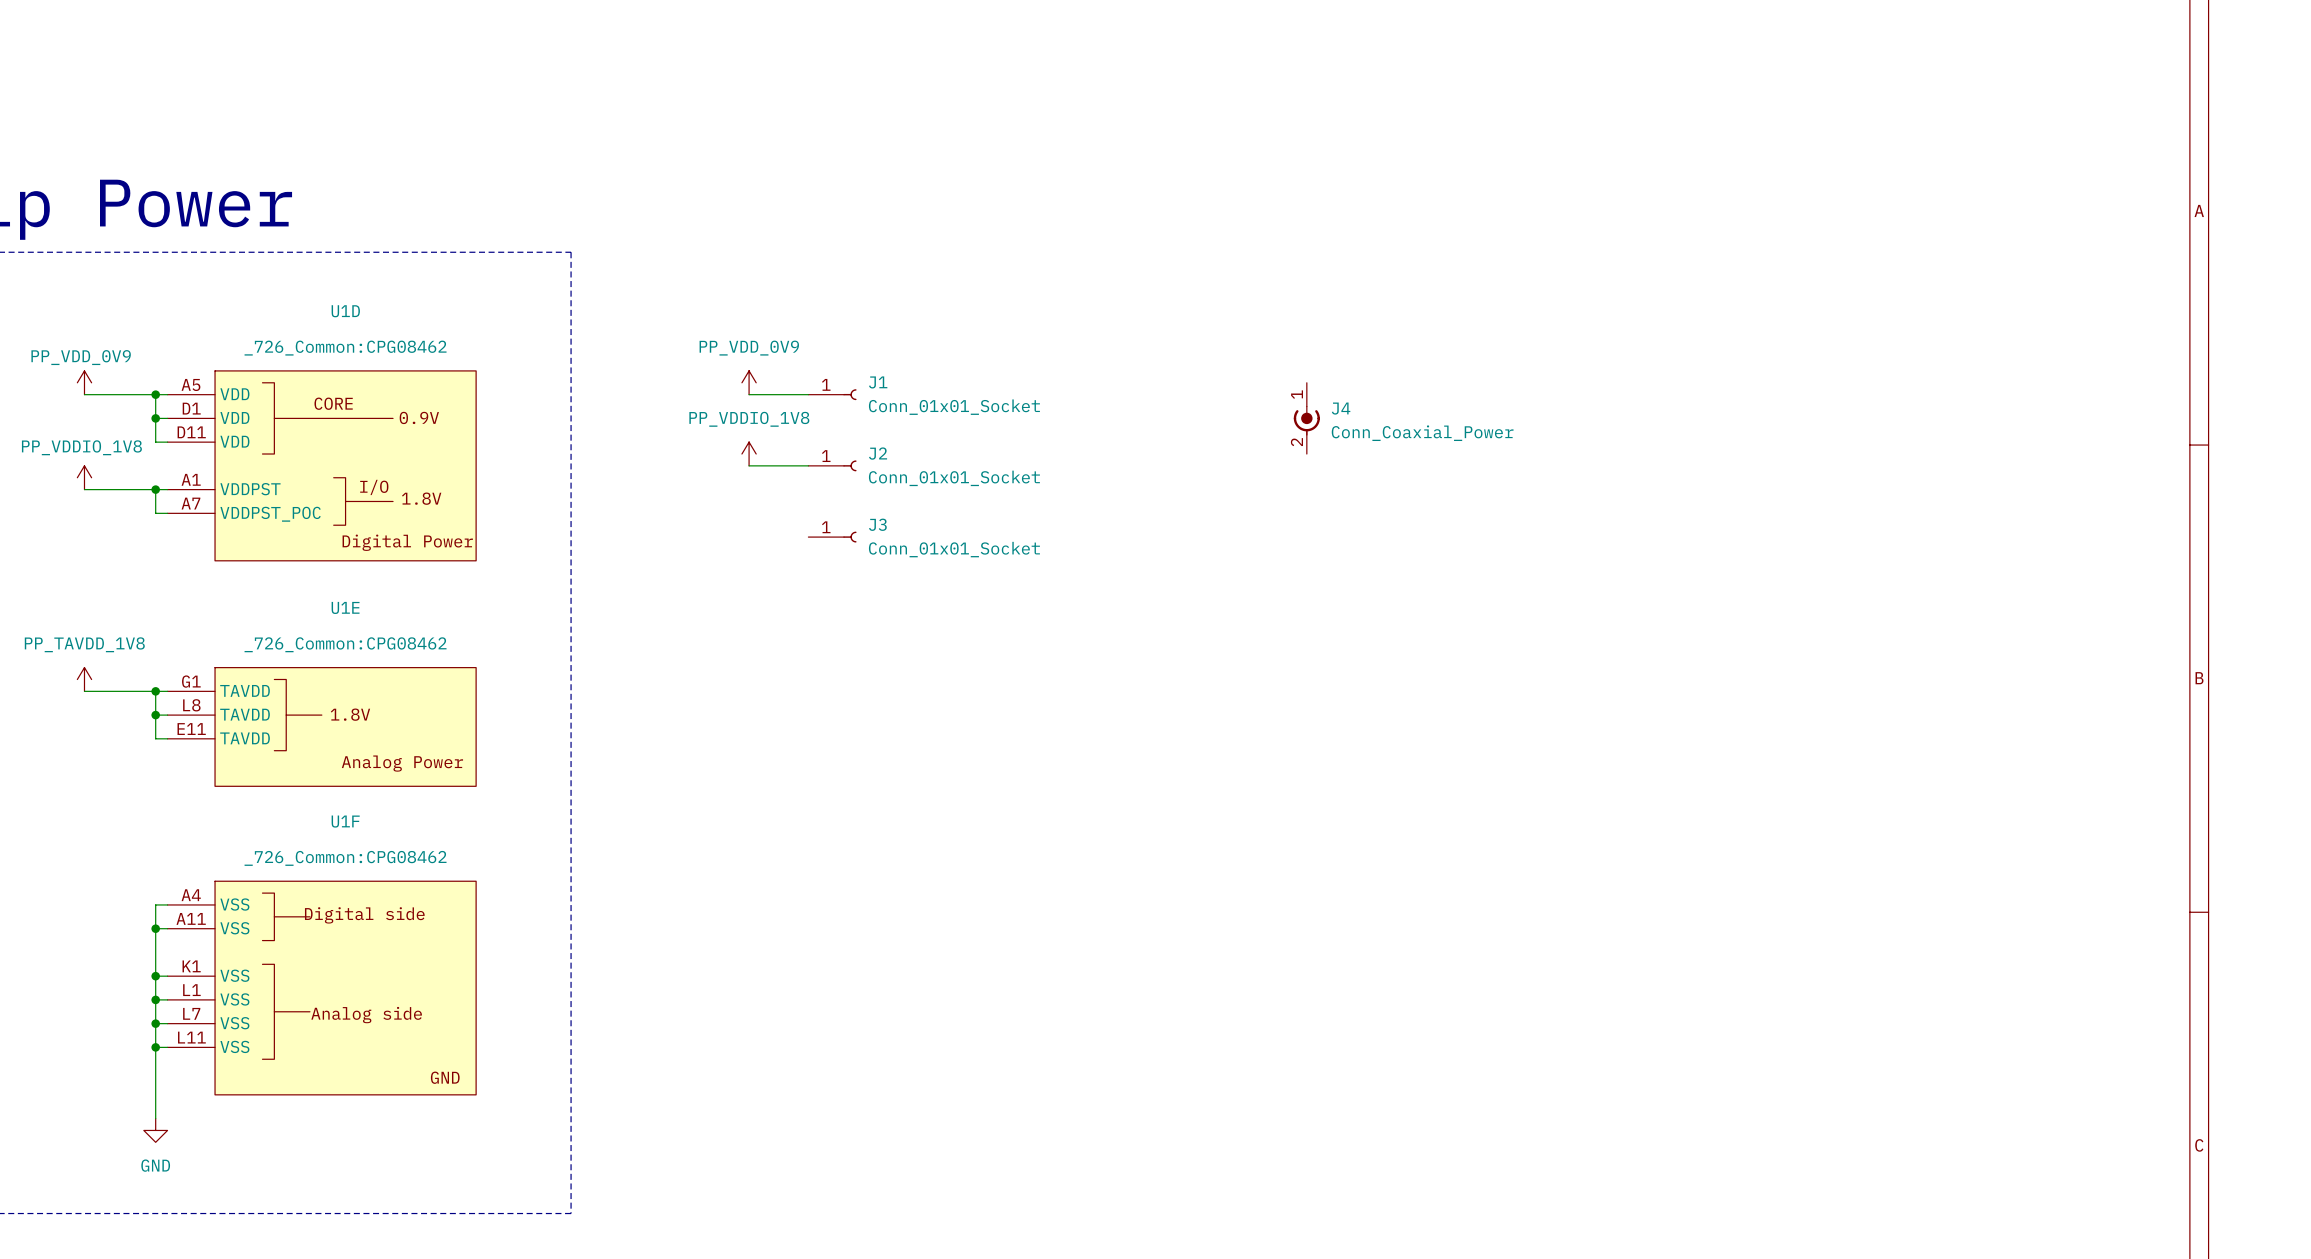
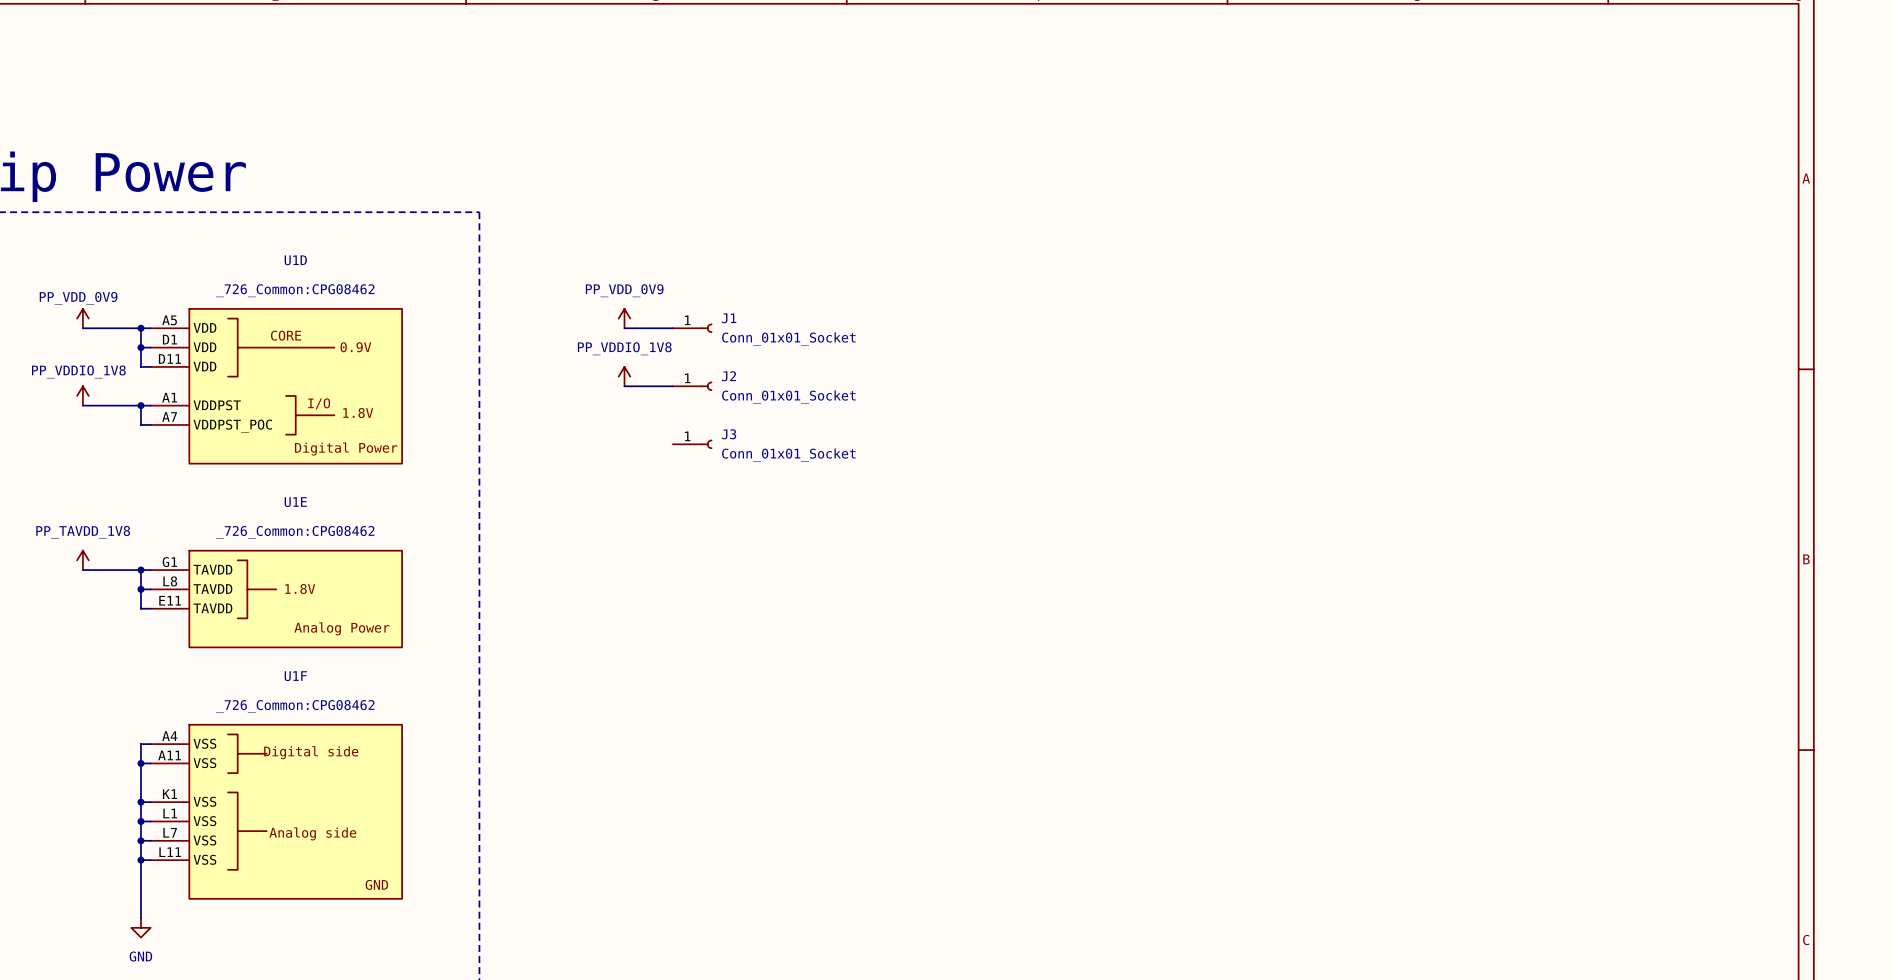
J4: Conn_Coaxial_Power (1306, 418) -> none

